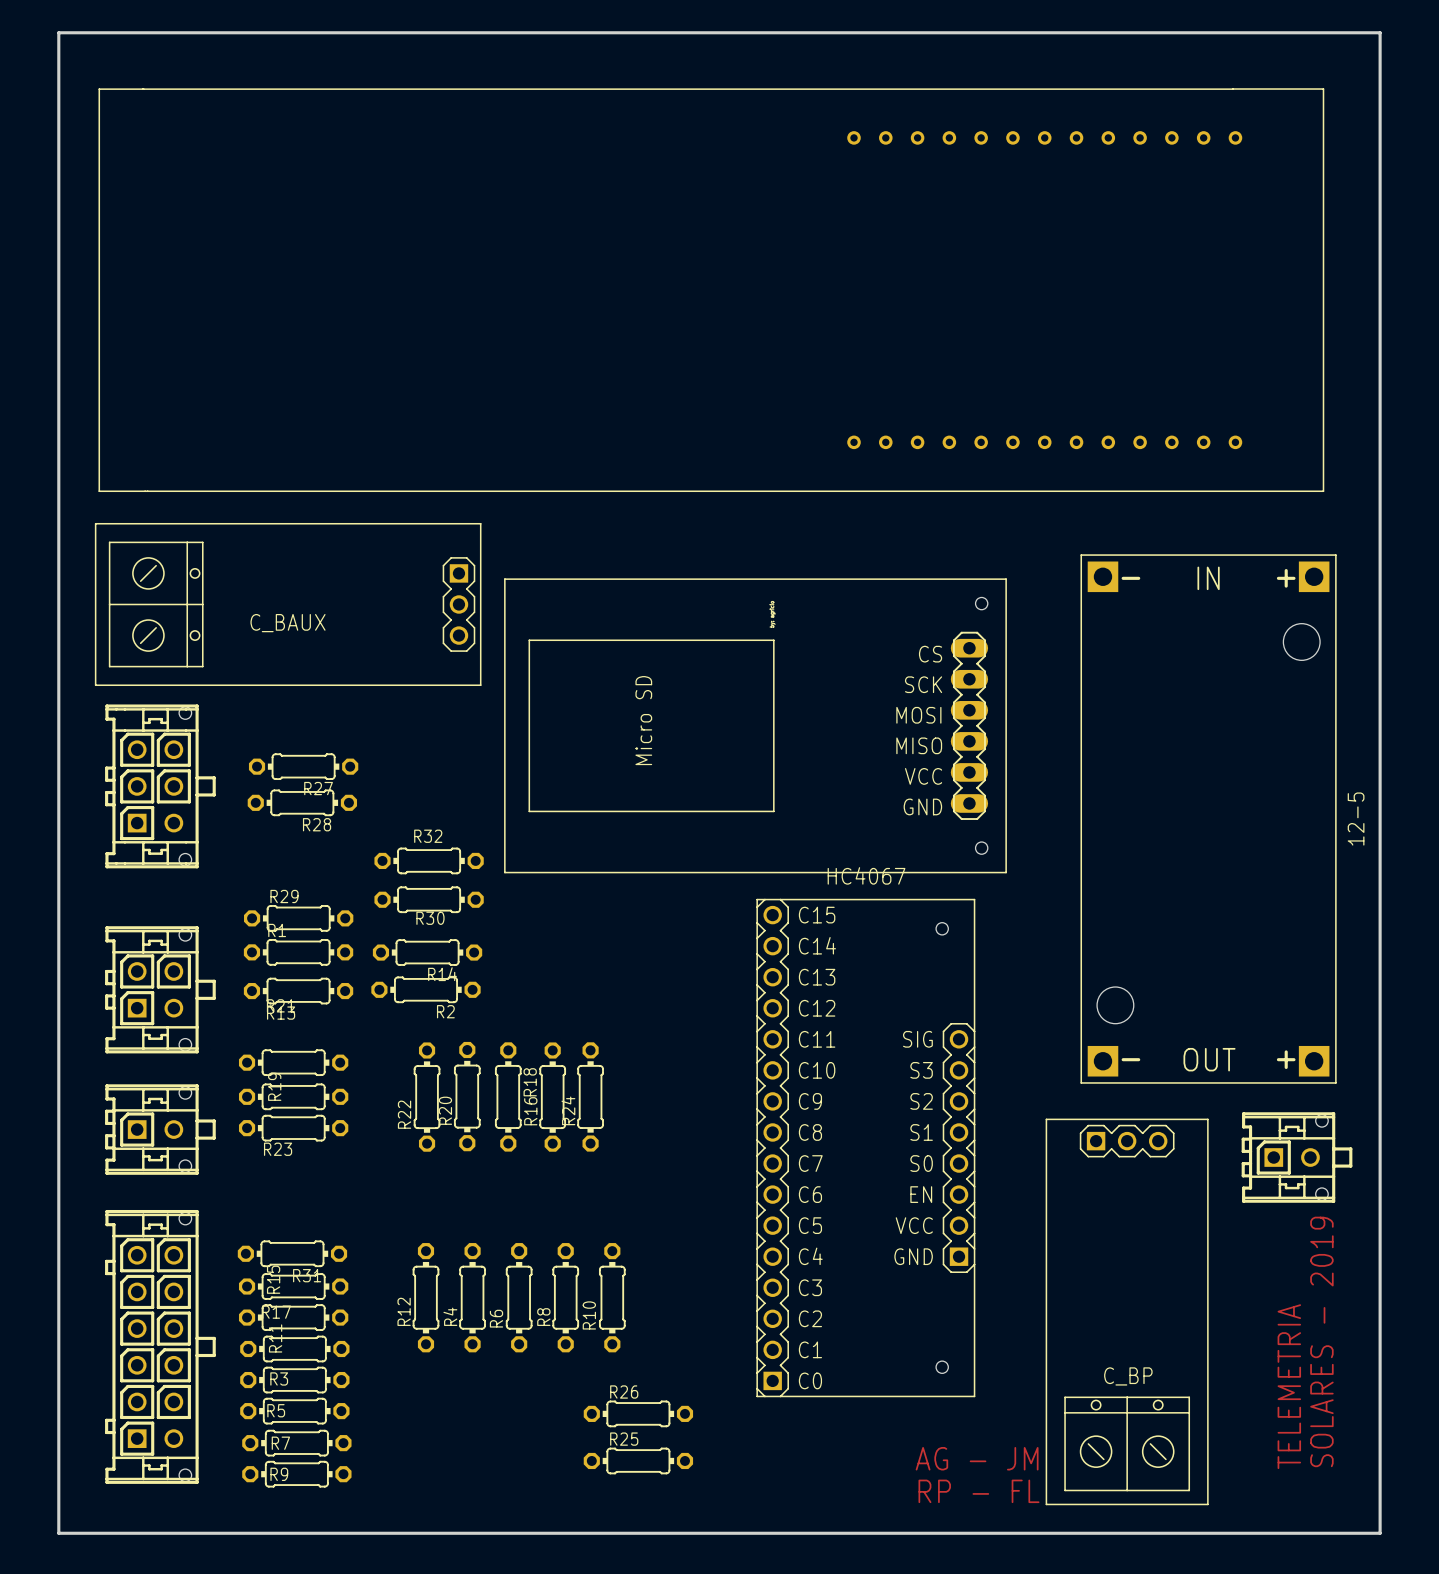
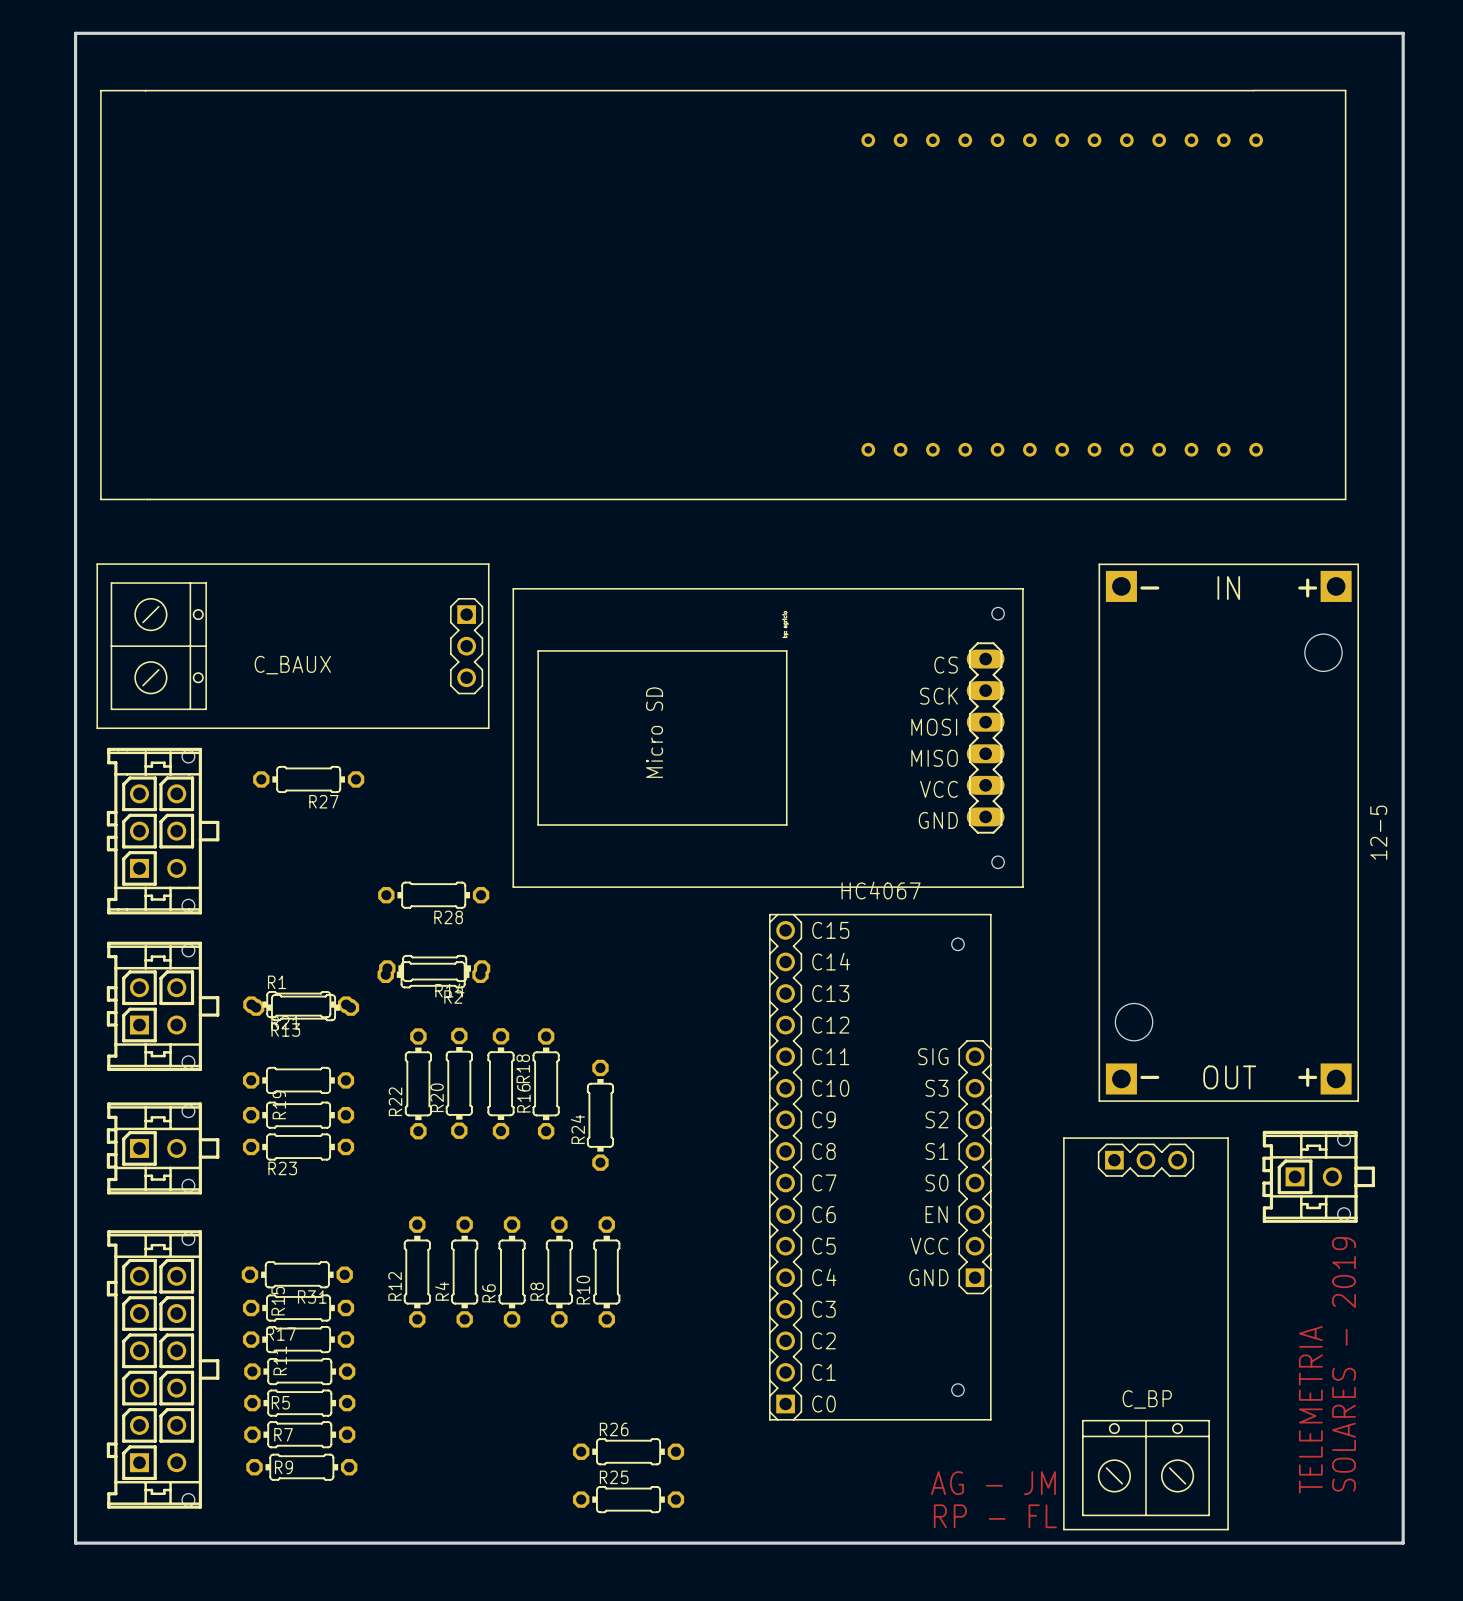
board edge: (74, 32) (58, 32) (58, 1533) (1380, 1533) (1380, 1517) -> (75, 33) (75, 1543) (1403, 1543)
C_BAUX position: (288, 604) -> (292, 646)
part position: (160, 786) -> (163, 831)
R28 position: (302, 802) -> (433, 895)
R32: (429, 860) -> none
R30: (429, 899) -> none
R29: (298, 918) -> none
R1 position: (298, 952) -> (298, 1004)
R2 position: (425, 989) -> (433, 974)
R20 position: (467, 1096) -> (459, 1083)
R18 position: (508, 1096) -> (500, 1083)
R22 position: (427, 1097) -> (418, 1083)
R16 position: (552, 1097) -> (546, 1083)
R12 position: (425, 1297) -> (417, 1272)
R4 position: (472, 1297) -> (464, 1272)
R6 position: (519, 1297) -> (512, 1272)
R8 position: (565, 1297) -> (559, 1272)
R10 position: (612, 1297) -> (606, 1272)
R3 name: R3 (279, 1378) -> R5 (280, 1402)
R5 name: R5 (276, 1410) -> R7 (283, 1434)
R26 position: (638, 1413) -> (628, 1451)
R7 name: R7 (280, 1443) -> R9 (283, 1467)
R25 position: (638, 1460) -> (628, 1499)
R9: (296, 1474) -> none

